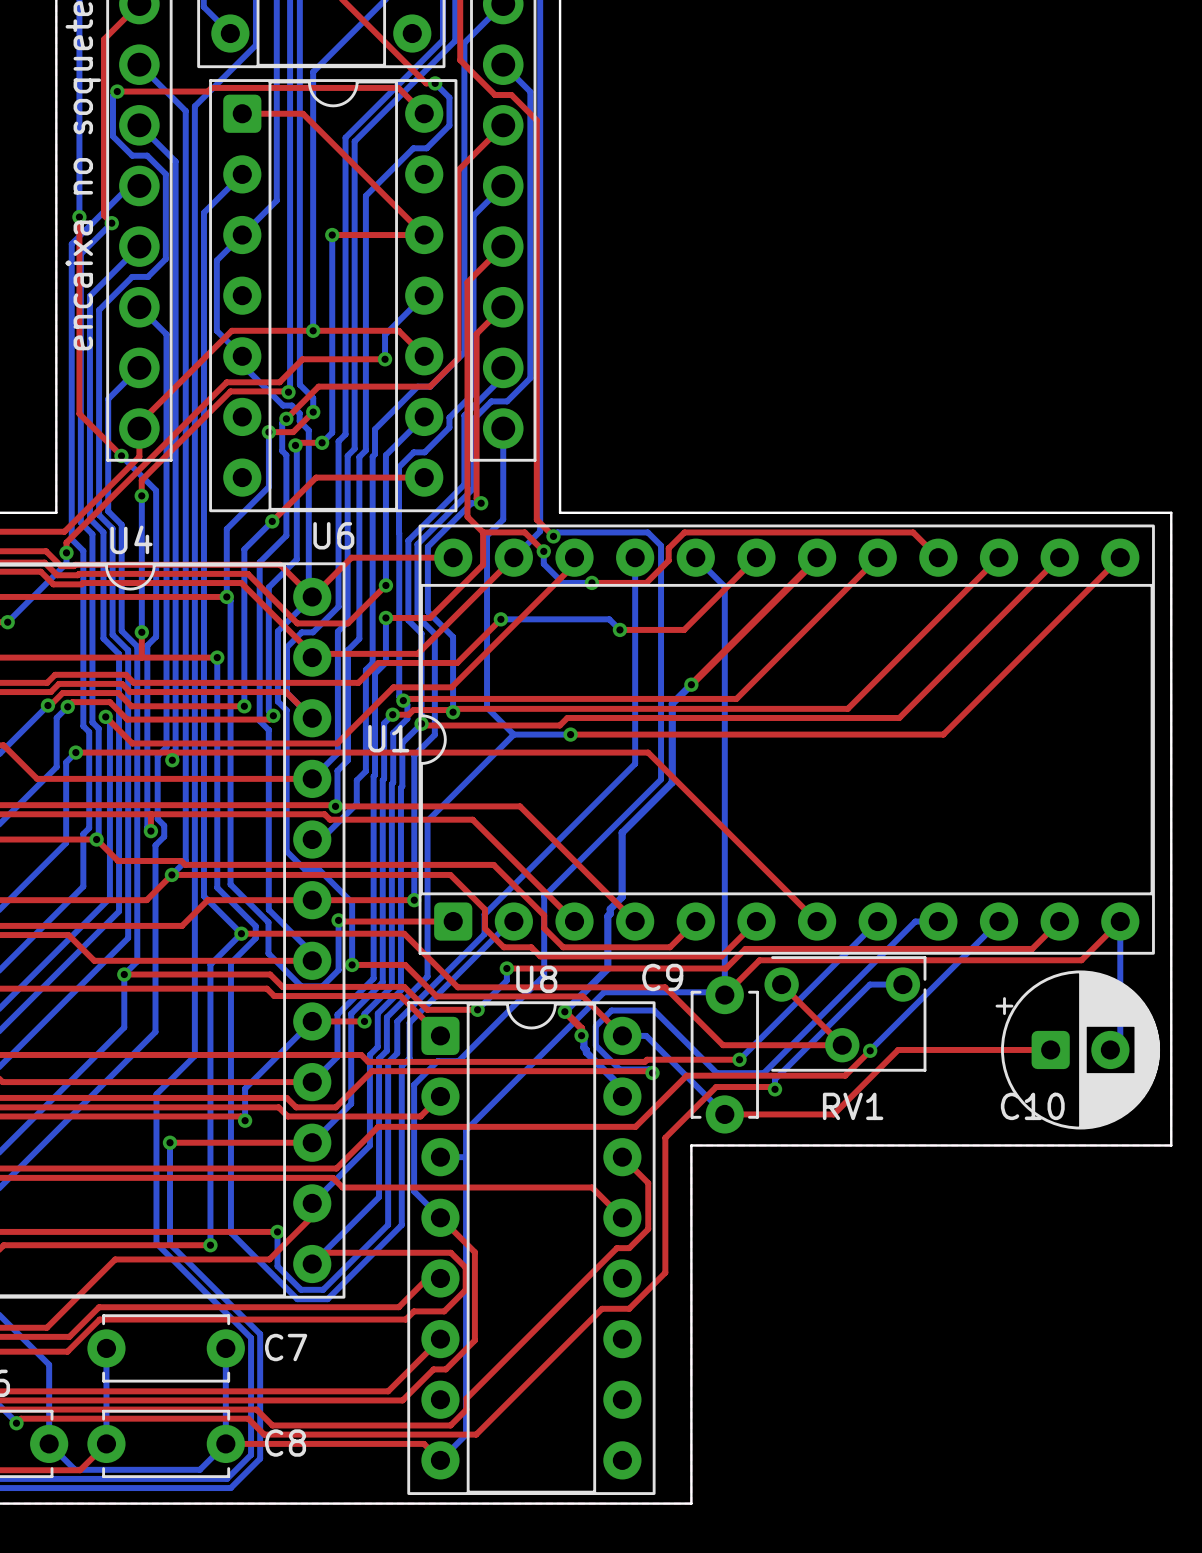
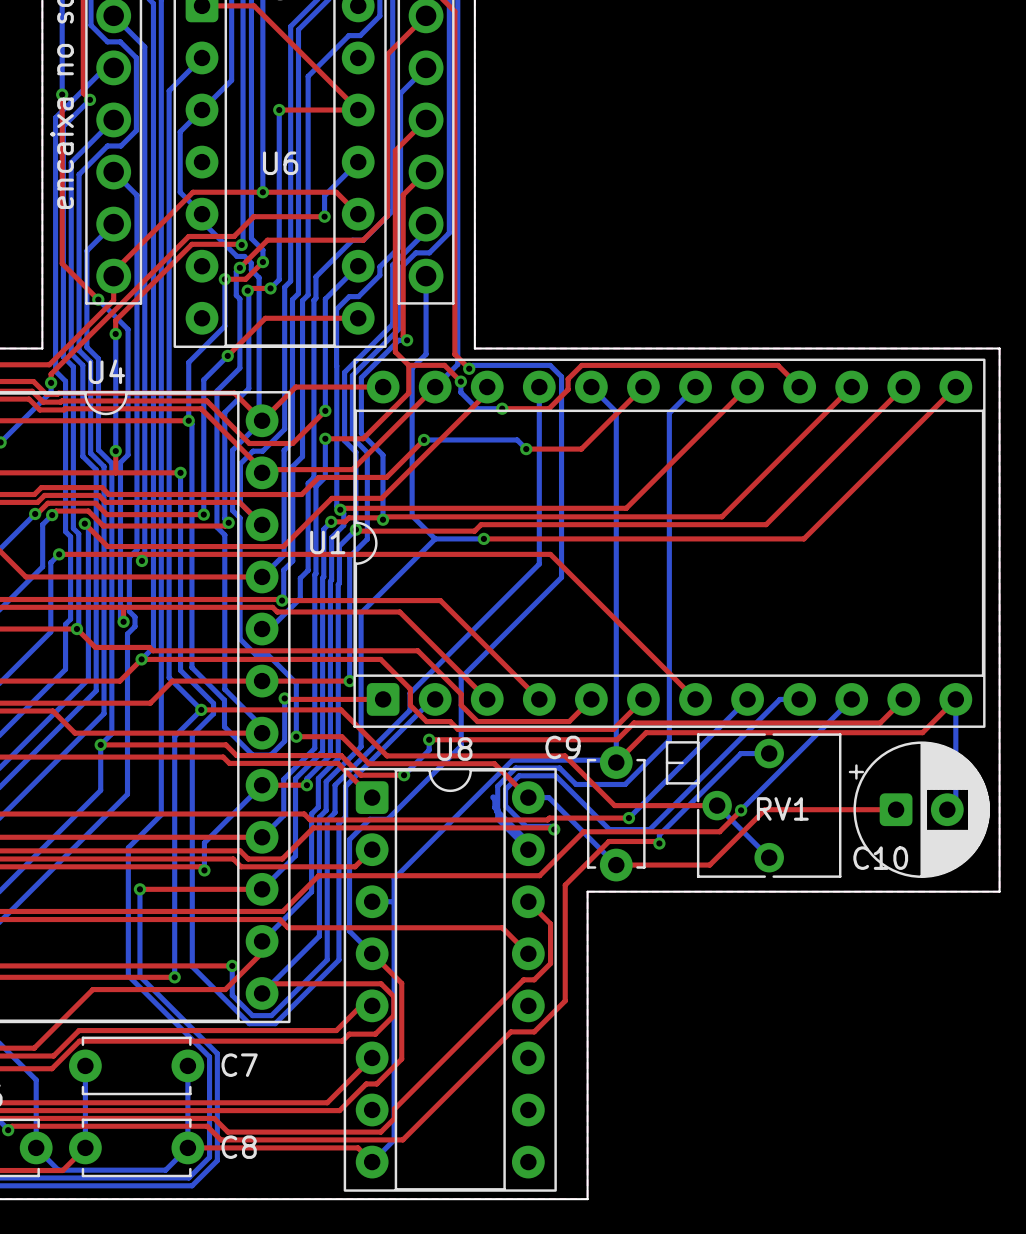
U6 name position: U6 (333, 535) -> U6 (280, 163)
bottom track: none -> (695, 387) (669, 413) (669, 740) (625, 784) (576, 784) (559, 768) (515, 768) (497, 786) (497, 819) (528, 849)
top track: (817, 558) (691, 684) -> none
bottom track: (691, 684) (672, 703) (672, 782) (622, 832) (622, 897) (610, 909) (610, 913) (607, 916) (607, 968) (564, 1011) -> none
via: (691, 684) -> none
RV1 footprint: [764, 956, 927, 1072] -> [665, 733, 842, 878]
top track: (781, 984) (842, 1045) -> none
top track: (564, 1011) (581, 1028) (581, 1035) -> none
via: (564, 1011) -> none
via: (581, 1035) -> none
bottom track: none -> (717, 805) (769, 857)
RV1 name position: RV1 (853, 1106) -> RV1 (782, 808)

